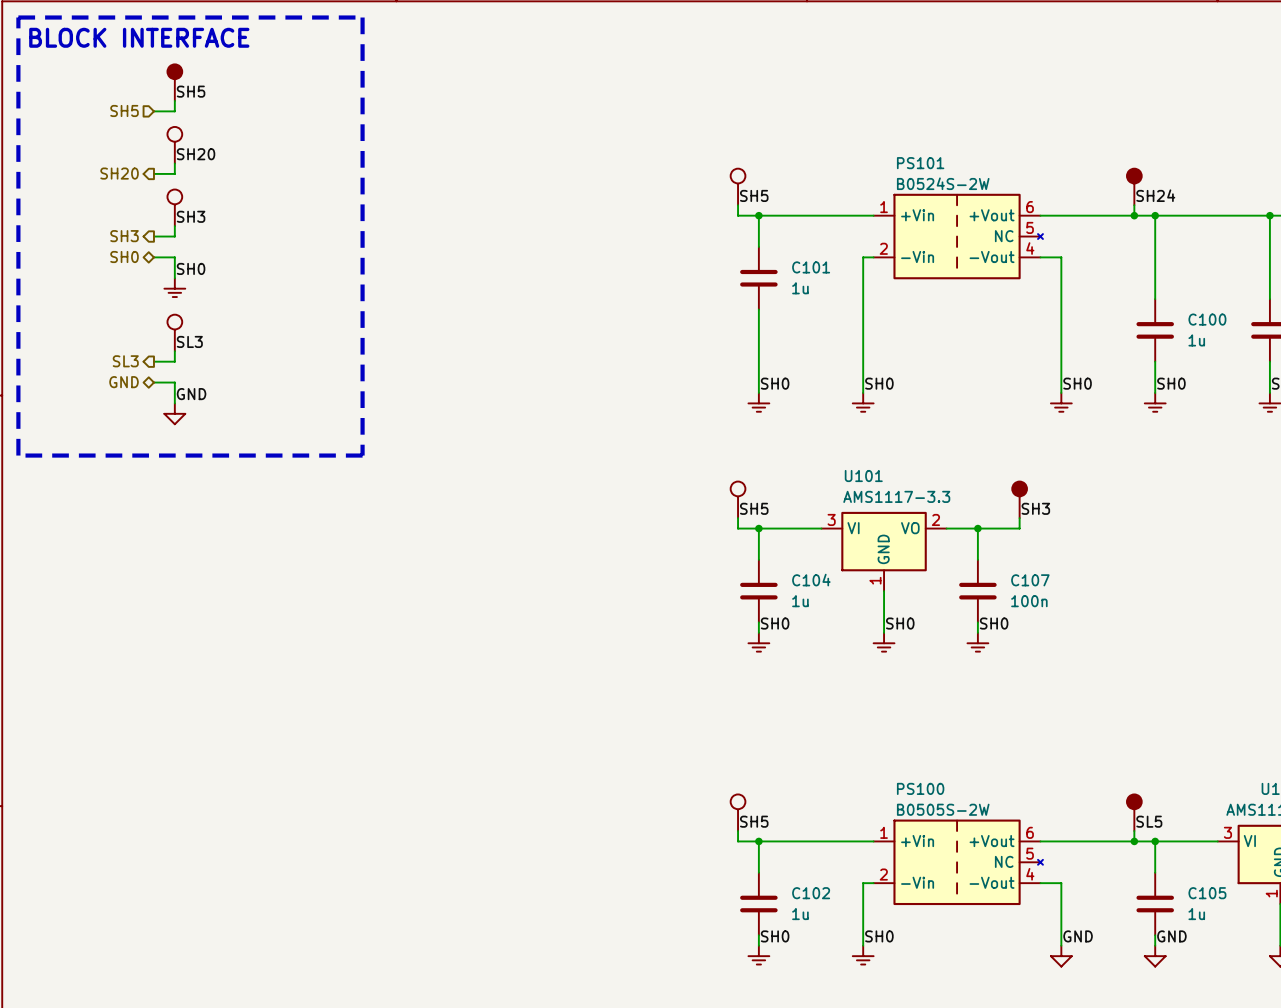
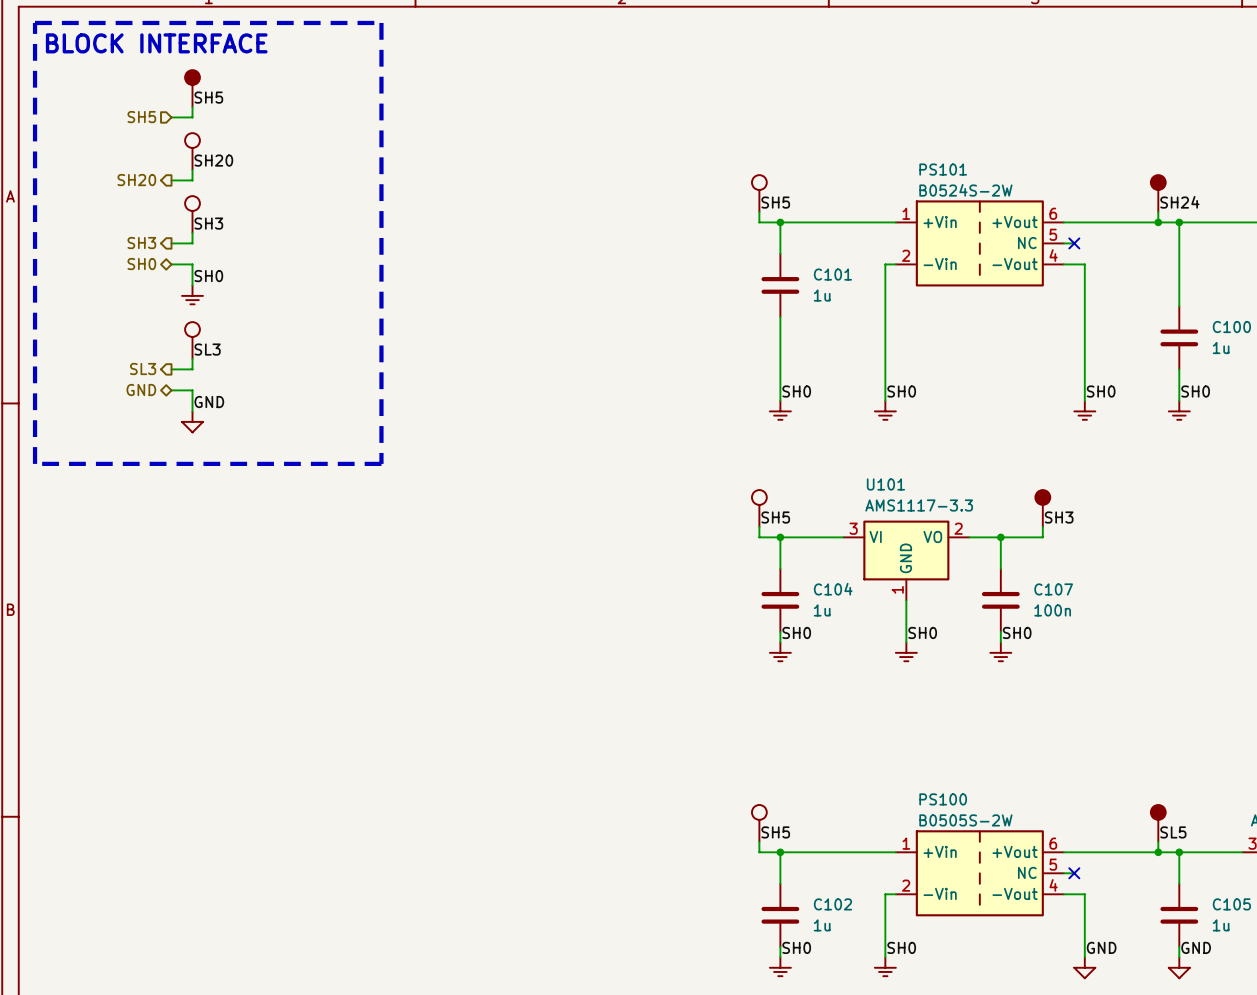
PS101 symbol: [873, 193, 1043, 280] -> [895, 200, 1064, 287]
wire: none -> (1063, 243) (1074, 243)
no-connect mark: none -> (1074, 243)
PS100 symbol: [873, 819, 1043, 906] -> [895, 830, 1064, 917]
wire: none -> (1063, 873) (1074, 873)
no-connect mark: none -> (1074, 873)

